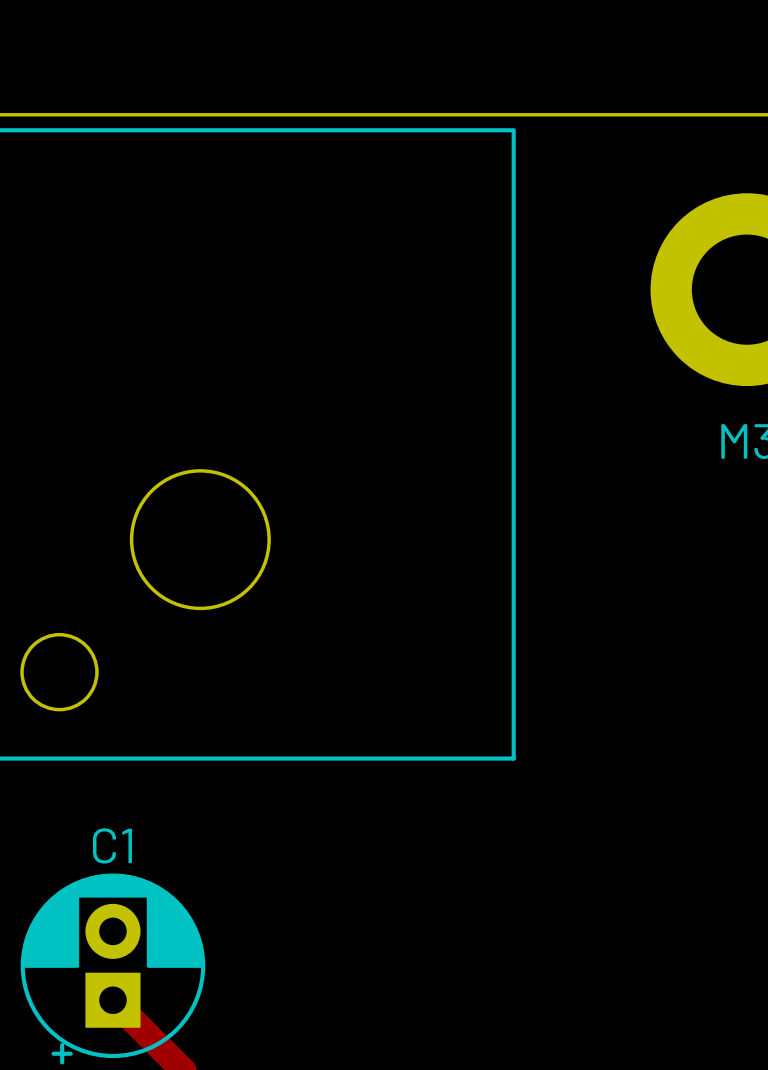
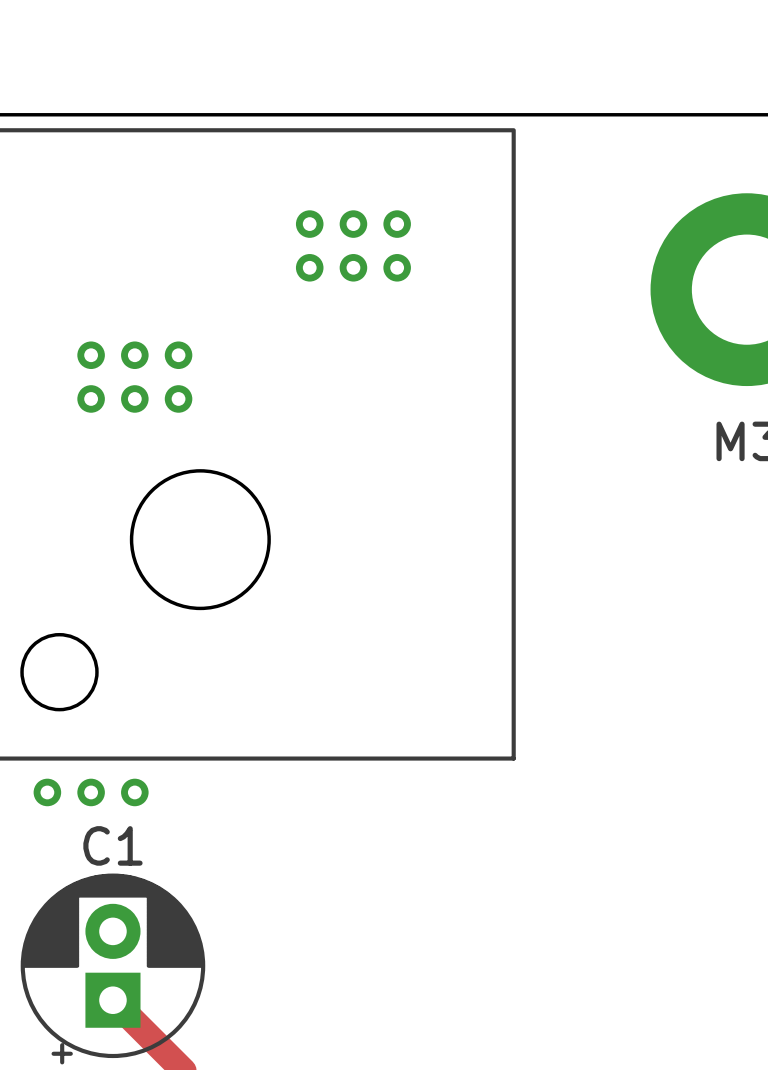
via: none -> (309, 224)
via: none -> (353, 224)
via: none -> (397, 224)
via: none -> (309, 267)
via: none -> (353, 267)
via: none -> (397, 267)
via: none -> (91, 355)
via: none -> (134, 355)
via: none -> (178, 355)
via: none -> (91, 398)
via: none -> (134, 398)
via: none -> (178, 398)
via: none -> (47, 792)
via: none -> (91, 792)
via: none -> (134, 792)

